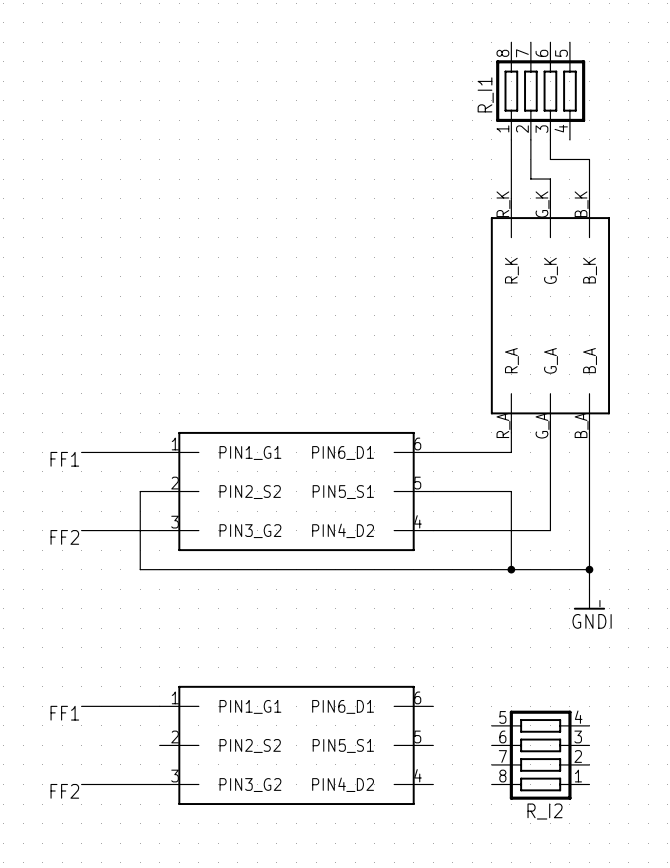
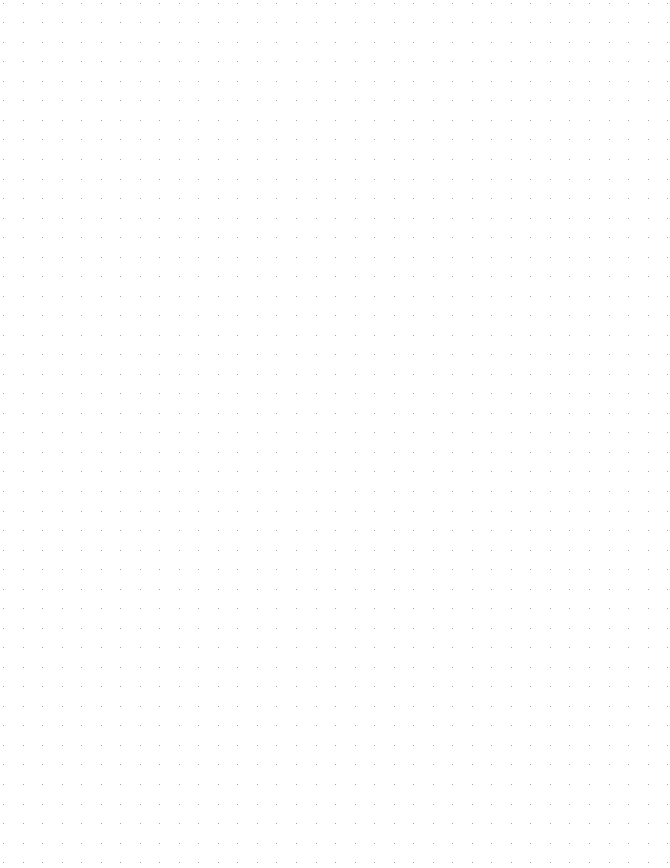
R_I1: (540, 91) -> none
wire: (511, 139) (511, 198) -> none
wire: (530, 139) (530, 179) (550, 179) (550, 198) -> none
wire: (550, 139) (550, 159) (589, 159) (589, 198) -> none
part: (550, 315) -> none
wire: (511, 432) (511, 452) (433, 452) -> none
wire: (550, 432) (550, 530) (433, 530) -> none
wire: (589, 432) (589, 589) -> none
wire: (81, 452) (159, 452) -> none
label: FF1 (64, 459) -> none
wire: (159, 491) (140, 491) (140, 569) (589, 569) -> none
part: (296, 491) -> none
wire: (433, 491) (511, 491) (511, 569) -> none
wire: (81, 530) (159, 530) -> none
label: FF2 (64, 537) -> none
junction: (511, 569) -> none
junction: (589, 569) -> none
power symbol: GNDI (589, 599) -> none
wire: (81, 706) (159, 706) -> none
label: FF1 (64, 713) -> none
part: (296, 745) -> none
R_I2: (540, 755) -> none
wire: (81, 784) (159, 784) -> none
label: FF2 (64, 791) -> none

